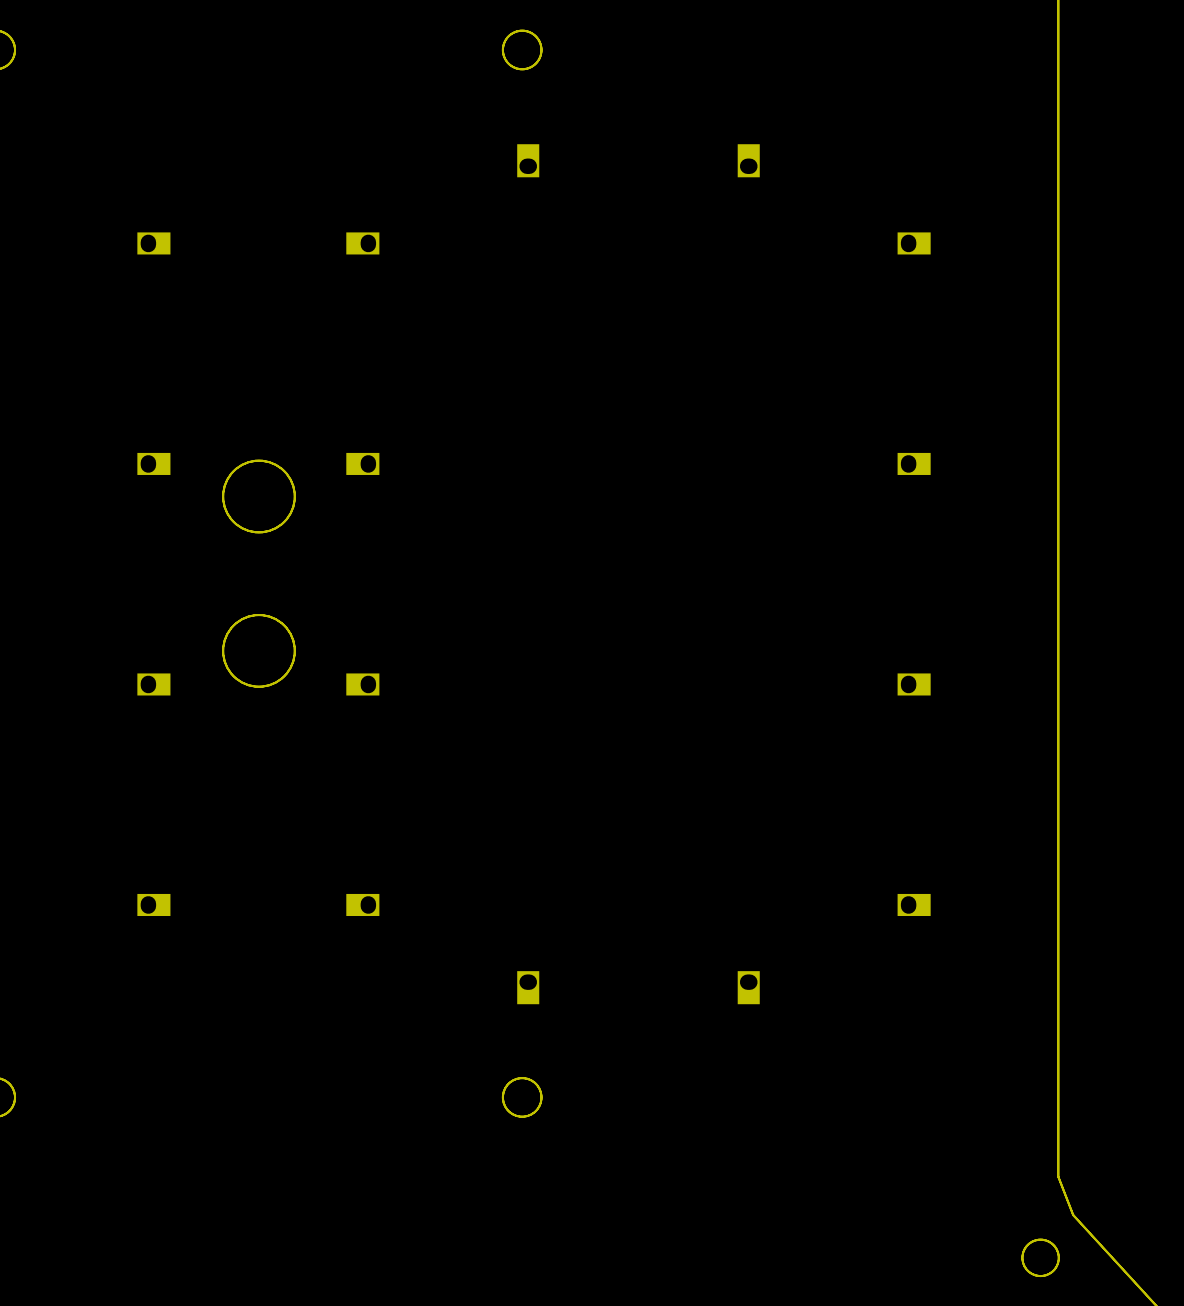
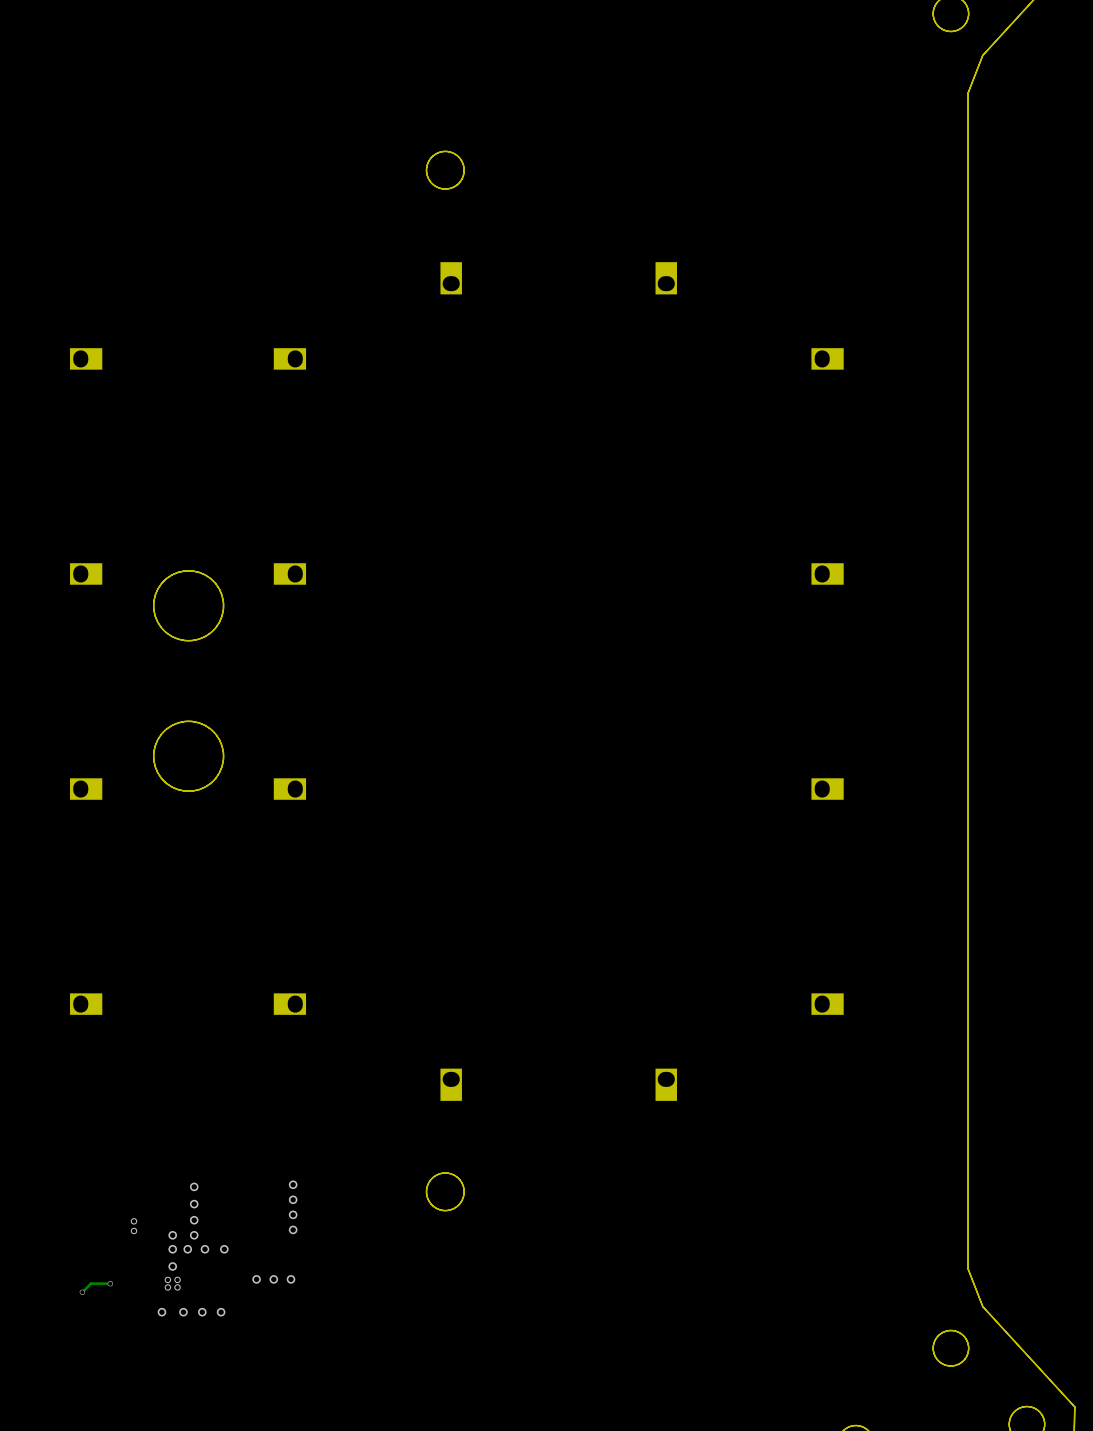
via: none -> (293, 1184)
via: none -> (194, 1186)
via: none -> (293, 1199)
via: none -> (194, 1204)
via: none -> (293, 1214)
via: none -> (194, 1220)
via: none -> (133, 1221)
via: none -> (293, 1229)
via: none -> (133, 1230)
via: none -> (172, 1235)
via: none -> (194, 1235)
via: none -> (172, 1249)
via: none -> (187, 1249)
via: none -> (204, 1249)
via: none -> (224, 1249)
via: none -> (172, 1266)
via: none -> (167, 1279)
via: none -> (177, 1279)
via: none -> (256, 1279)
via: none -> (273, 1279)
via: none -> (290, 1279)
track: none -> (110, 1283) (90, 1283) (82, 1292)
via: none -> (110, 1283)
via: none -> (167, 1287)
via: none -> (177, 1287)
via: none -> (82, 1292)
via: none -> (161, 1312)
via: none -> (183, 1312)
via: none -> (202, 1312)
via: none -> (221, 1312)

